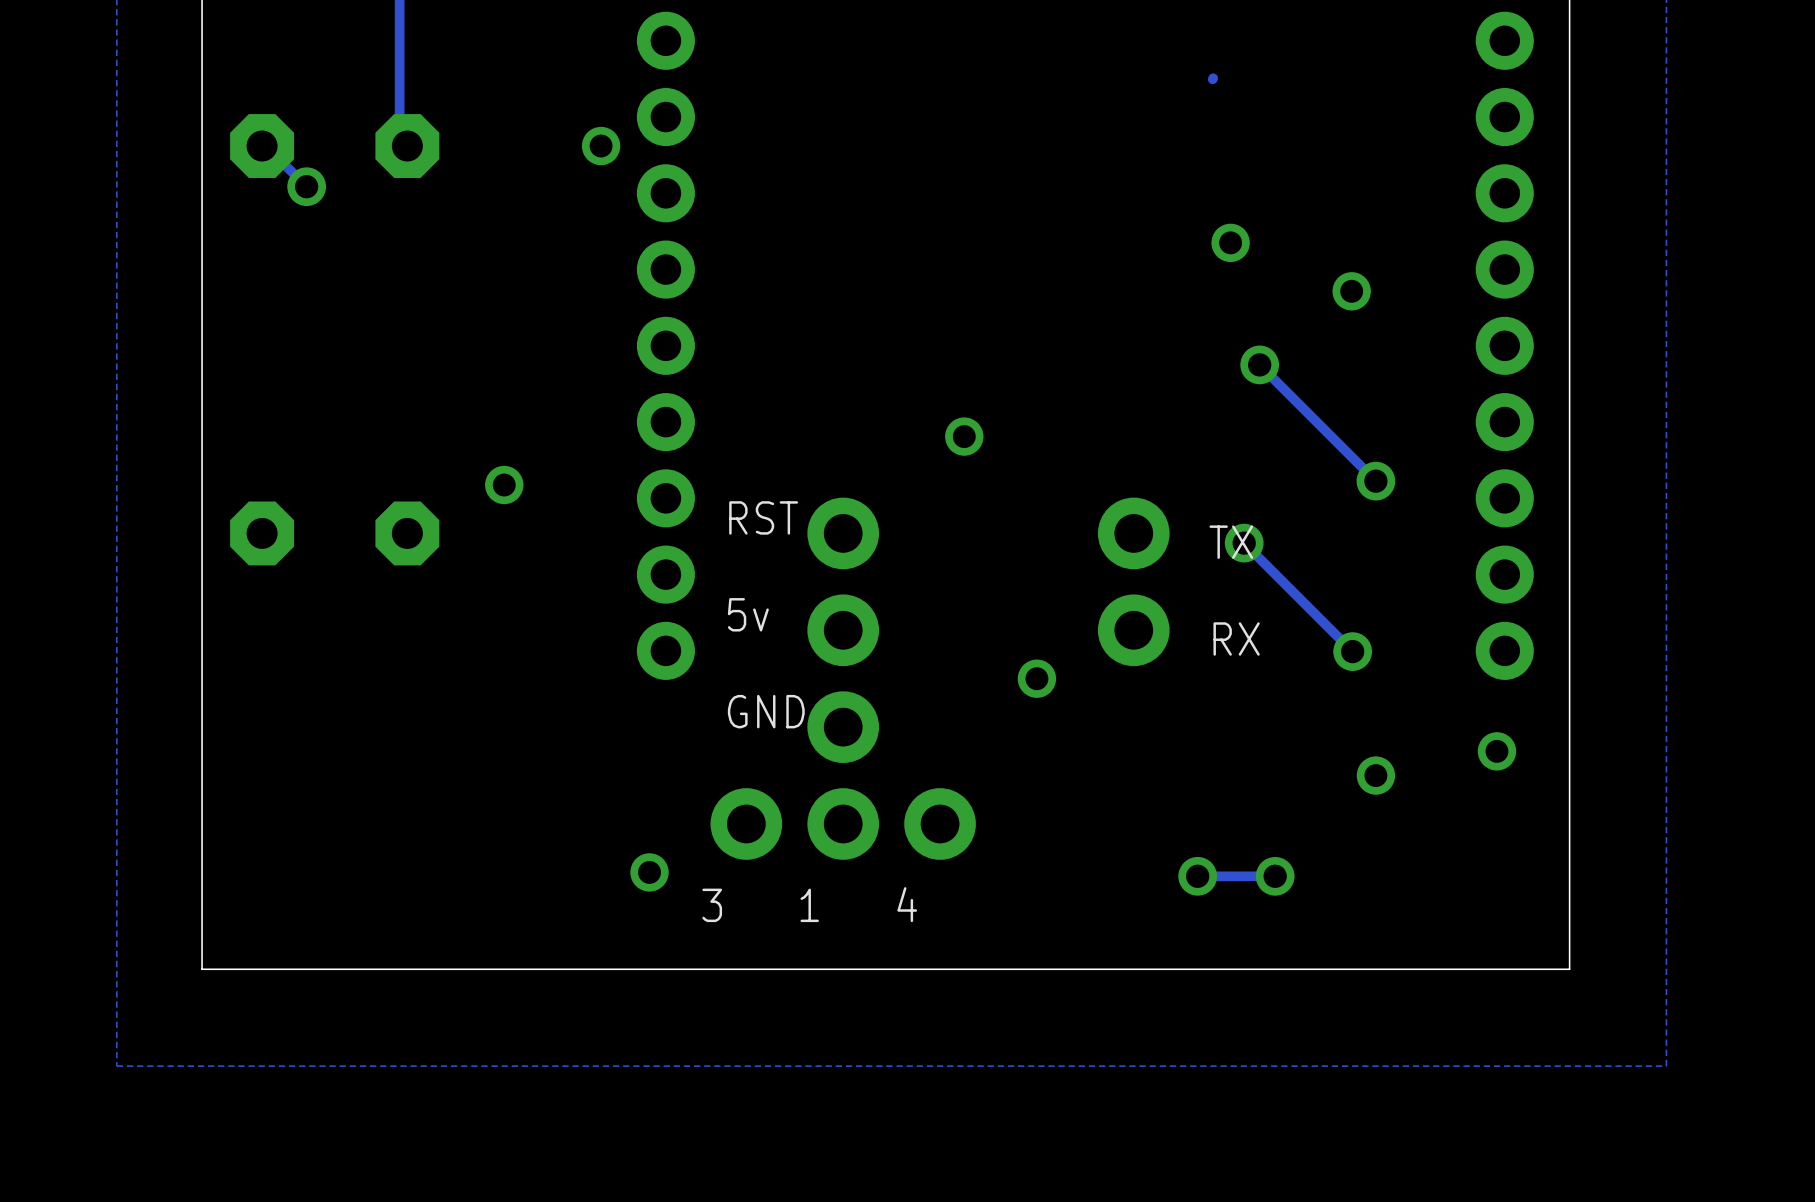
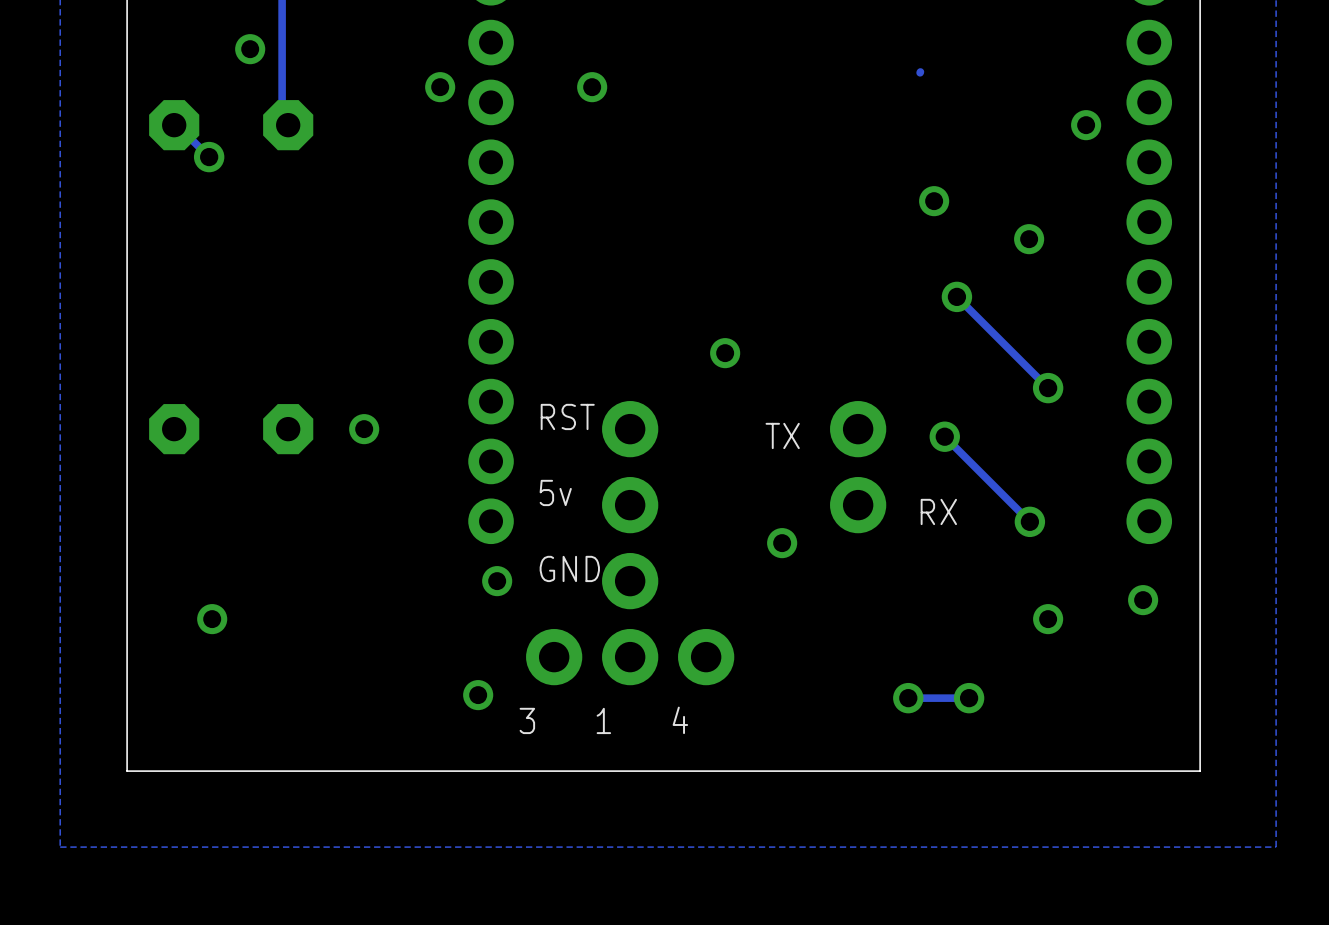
via: none -> (250, 49)
via: none -> (592, 87)
via position: (601, 146) -> (440, 87)
via: none -> (1086, 125)
via position: (504, 485) -> (364, 429)
text position: TX (1231, 542) -> TX (782, 435)
via: none -> (497, 581)
via: none -> (212, 619)

